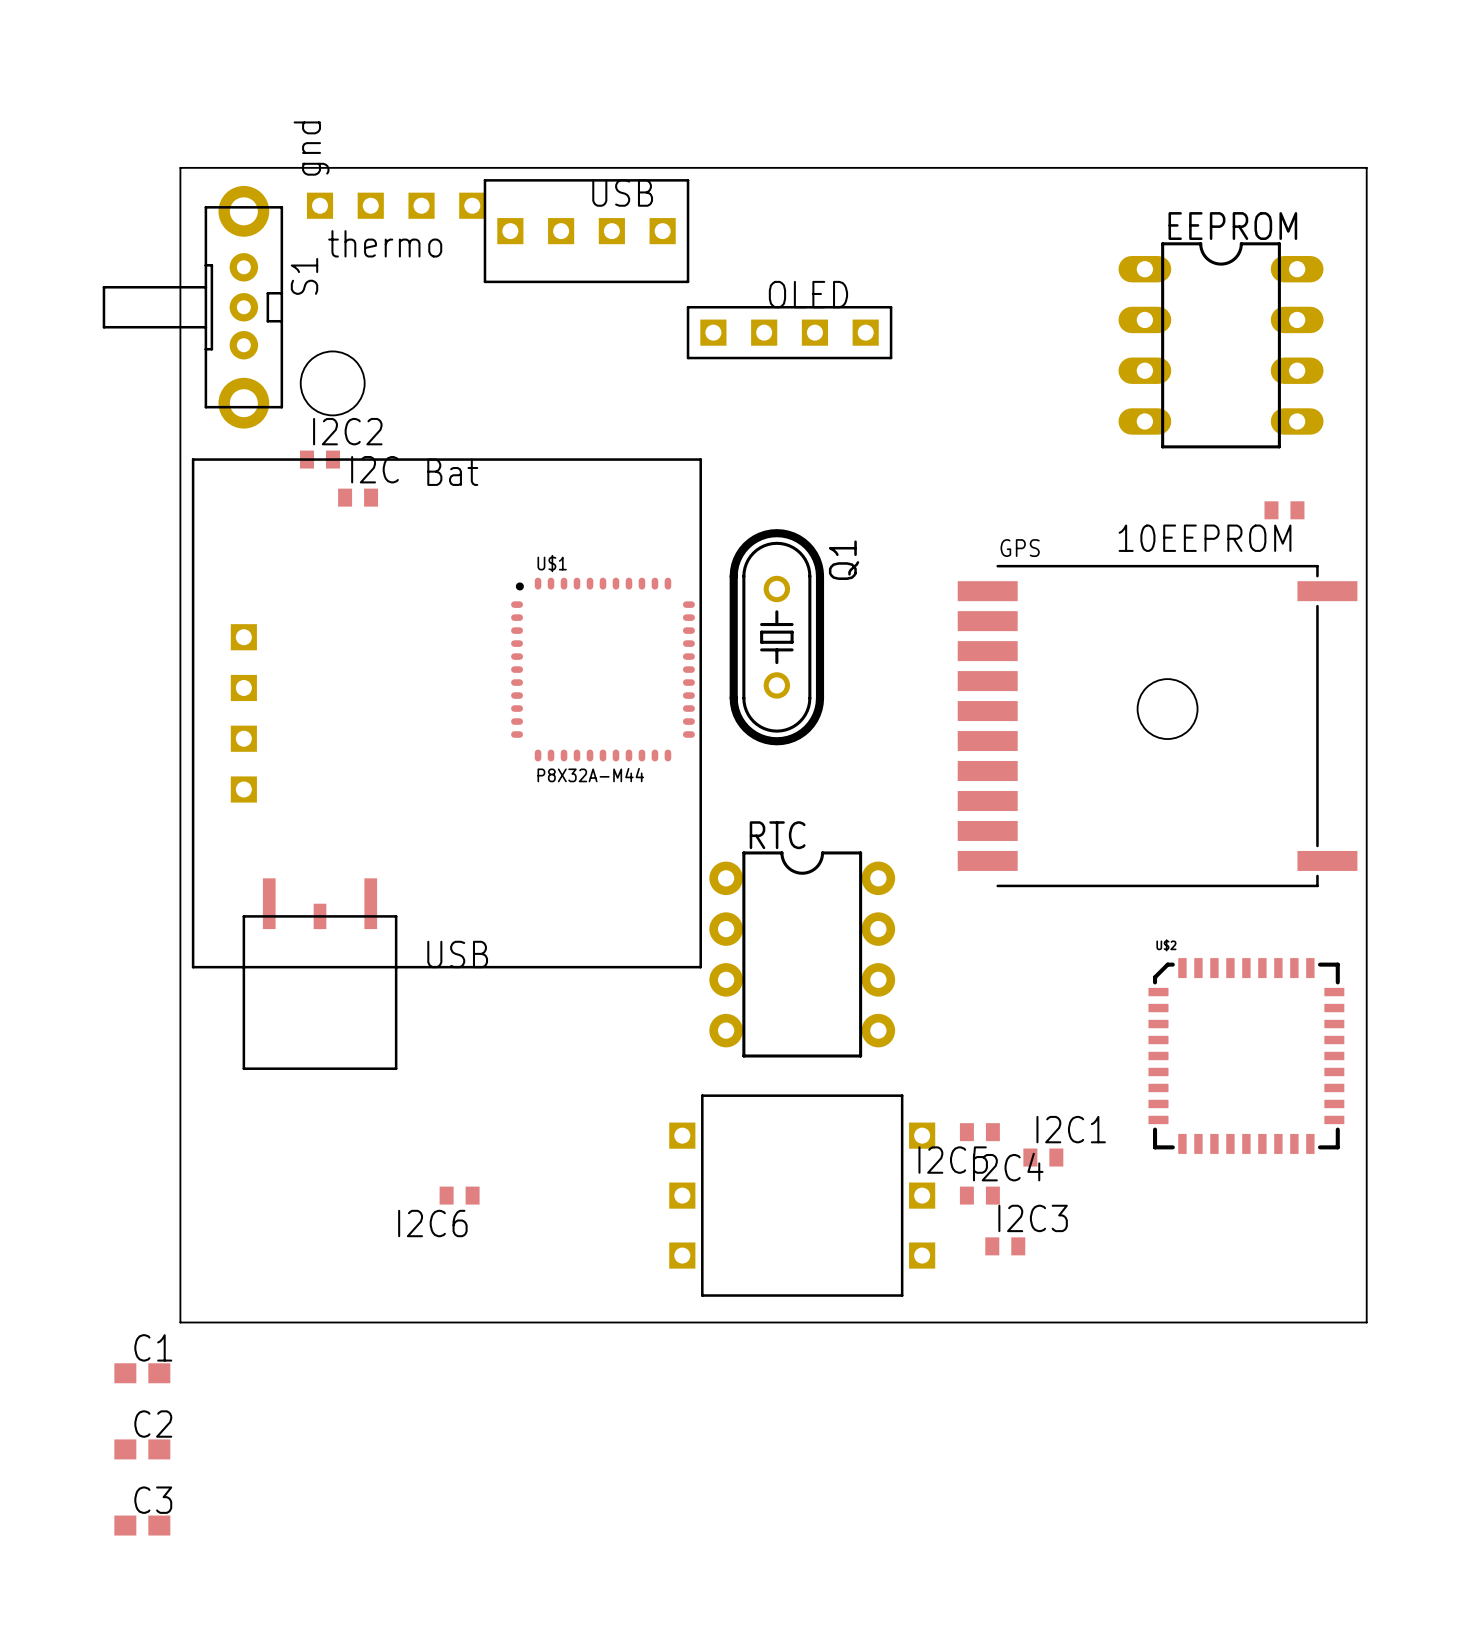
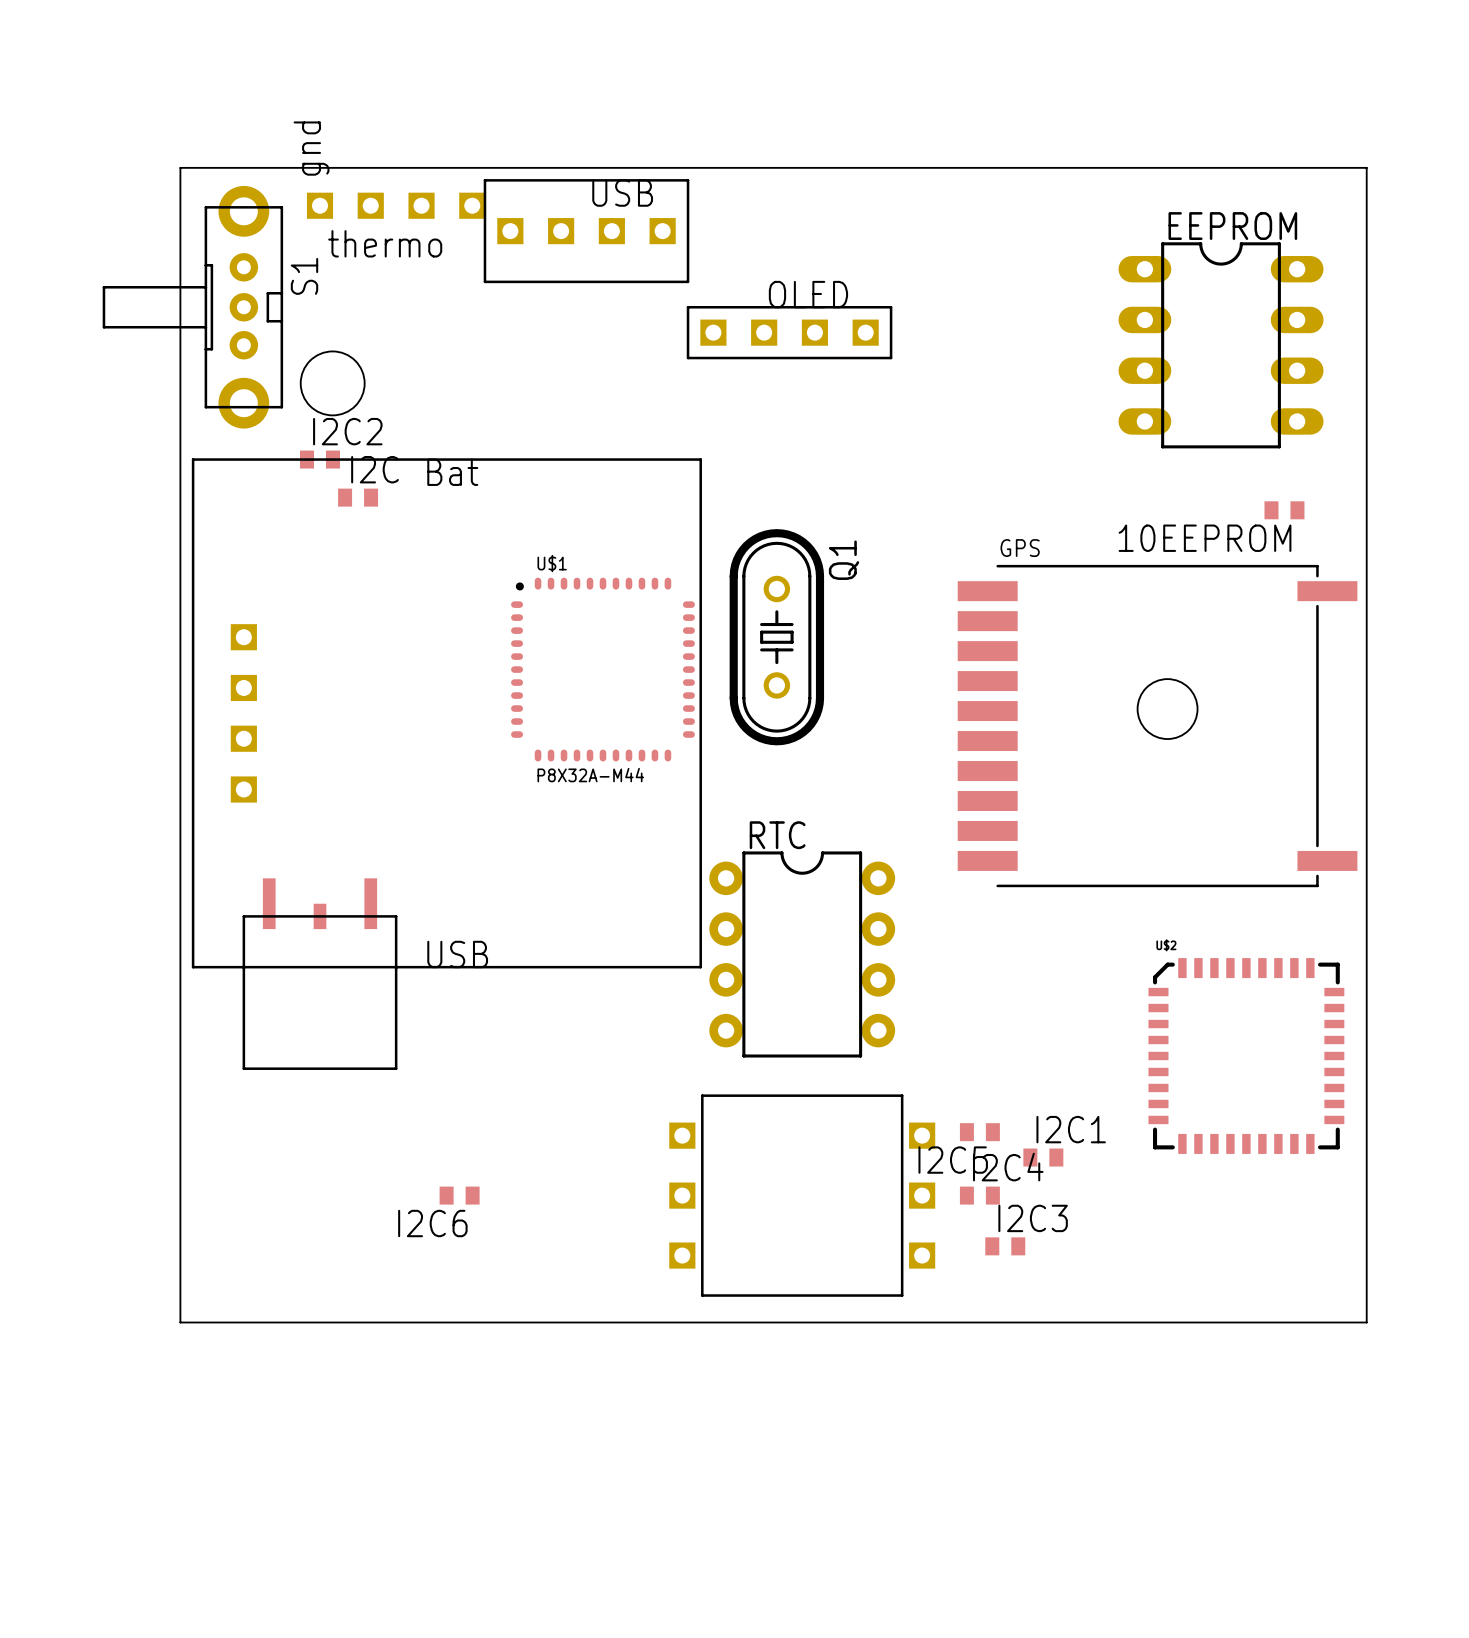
C1: (142, 1373) -> none
C2: (142, 1449) -> none
C3: (142, 1525) -> none

